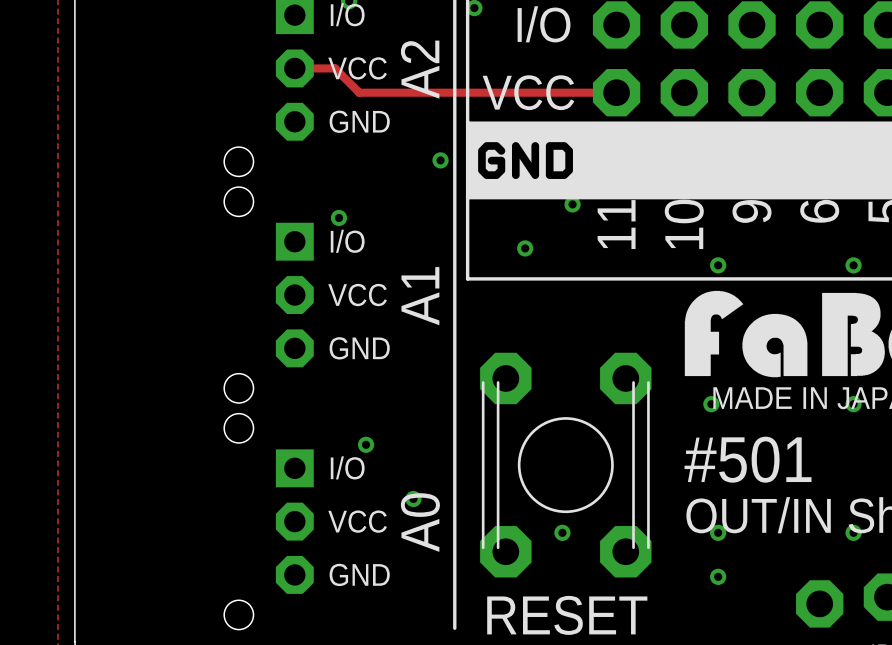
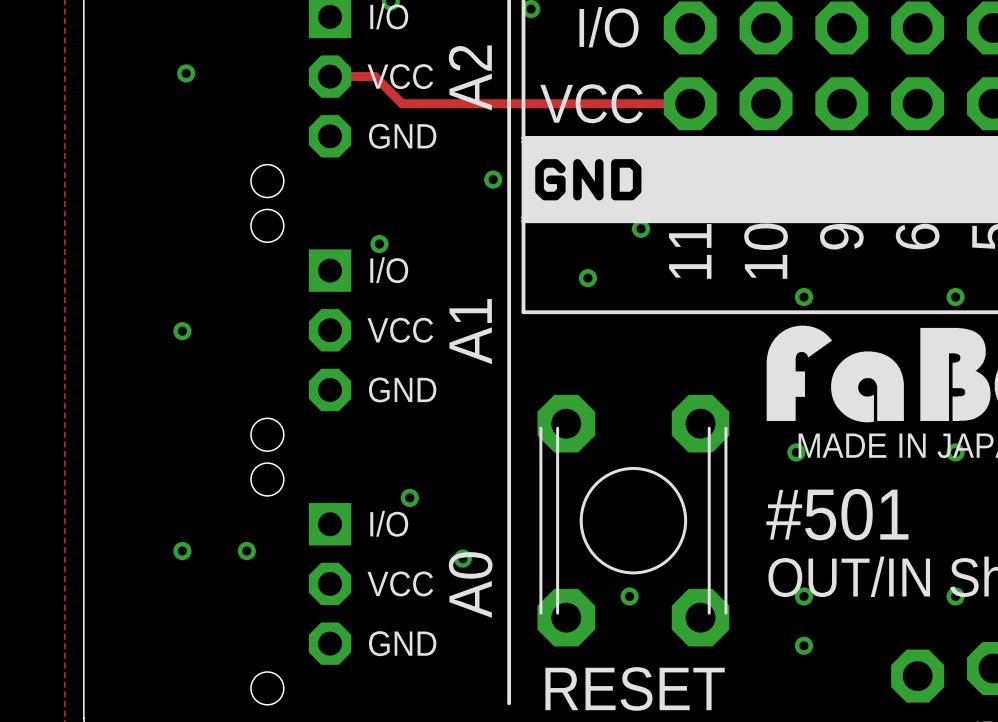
via: none -> (186, 73)
via: none -> (182, 331)
via: none -> (182, 551)
via: none -> (246, 551)

